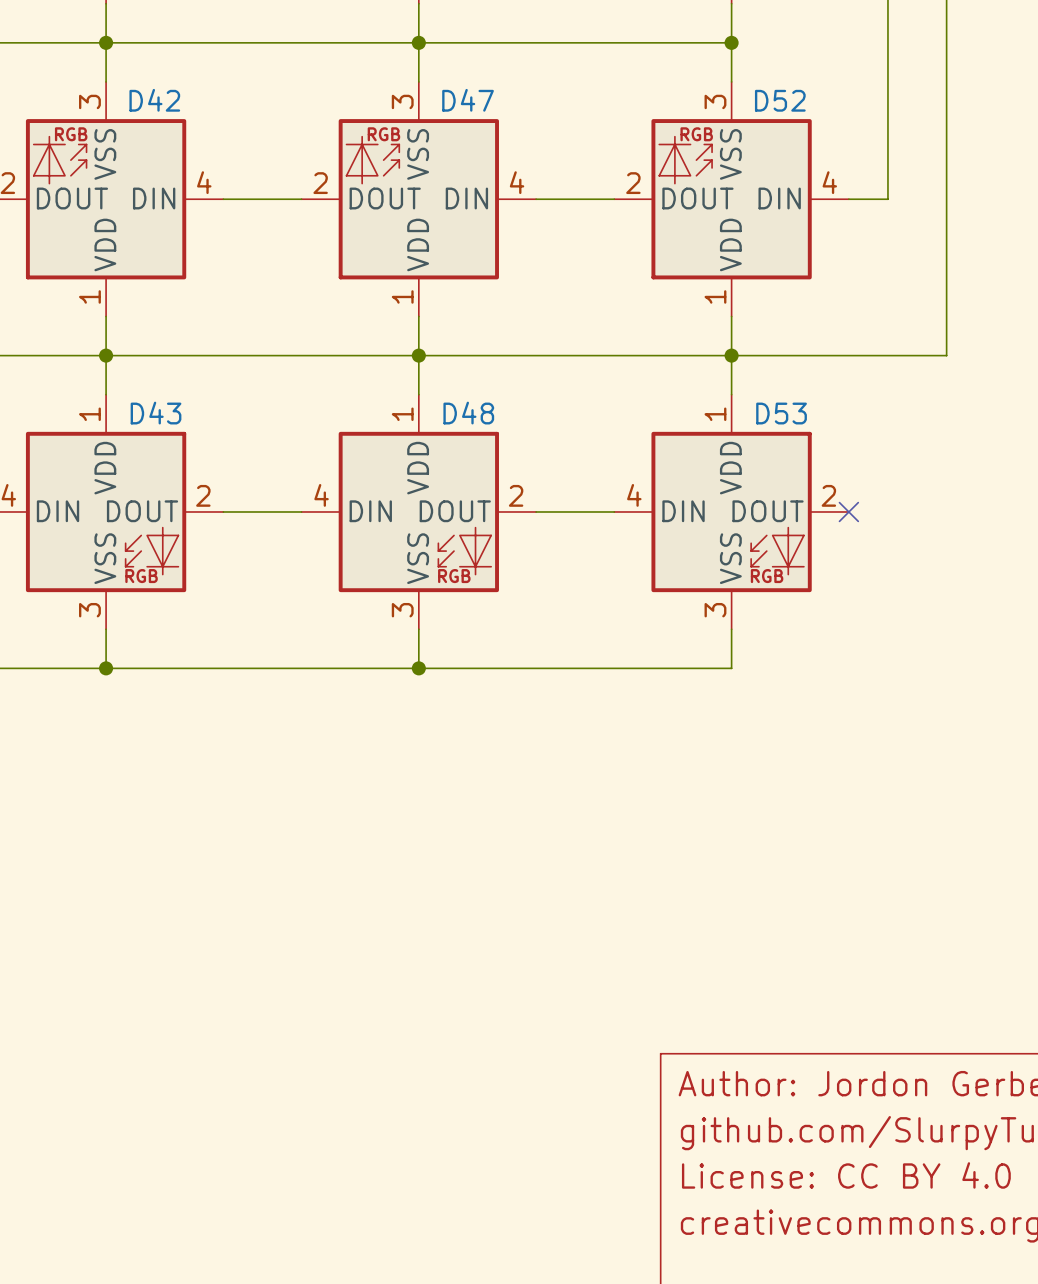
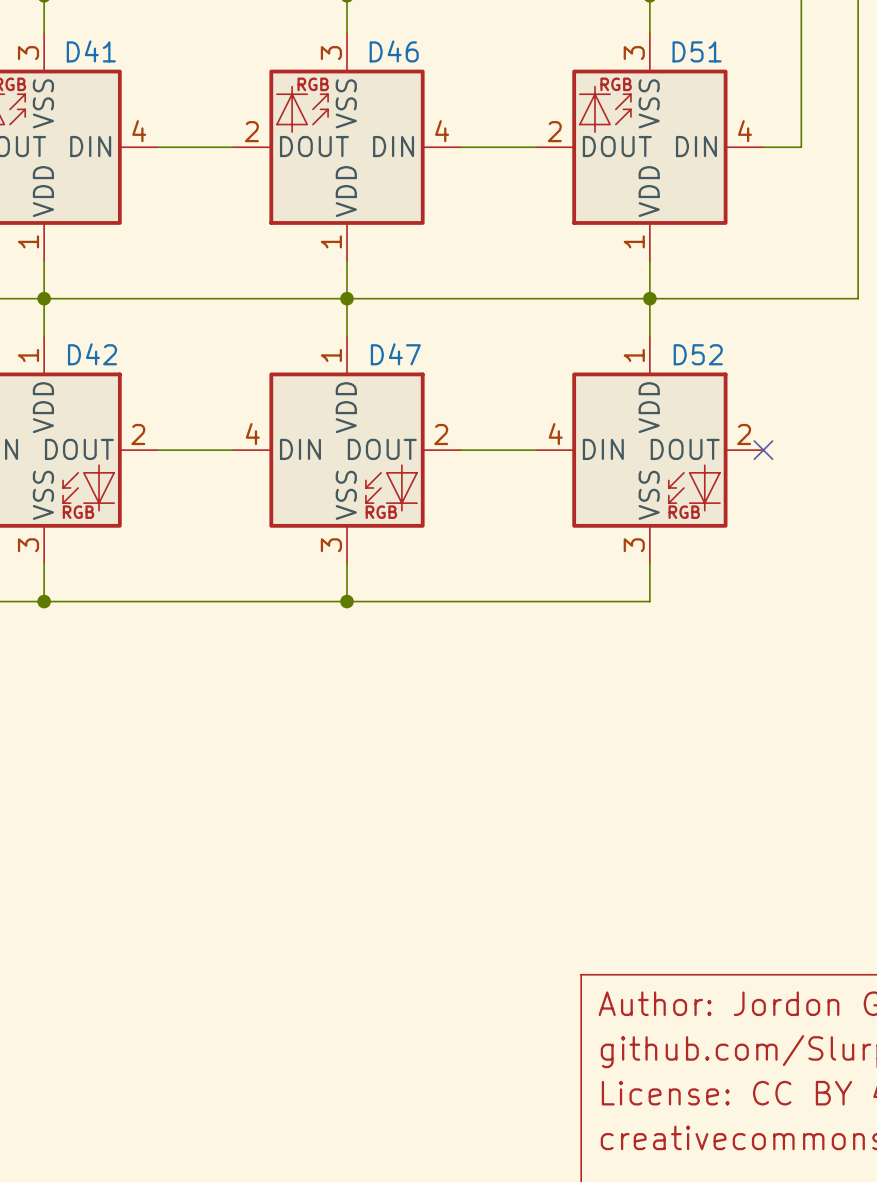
D42 name: D42 (154, 100) -> D41 (91, 51)
D47 name: D47 (468, 100) -> D46 (394, 51)
D52 name: D52 (780, 100) -> D51 (697, 51)
D43 name: D43 (156, 413) -> D42 (92, 354)
D48 name: D48 (468, 413) -> D47 (395, 354)
D53 name: D53 (781, 413) -> D52 (698, 354)

